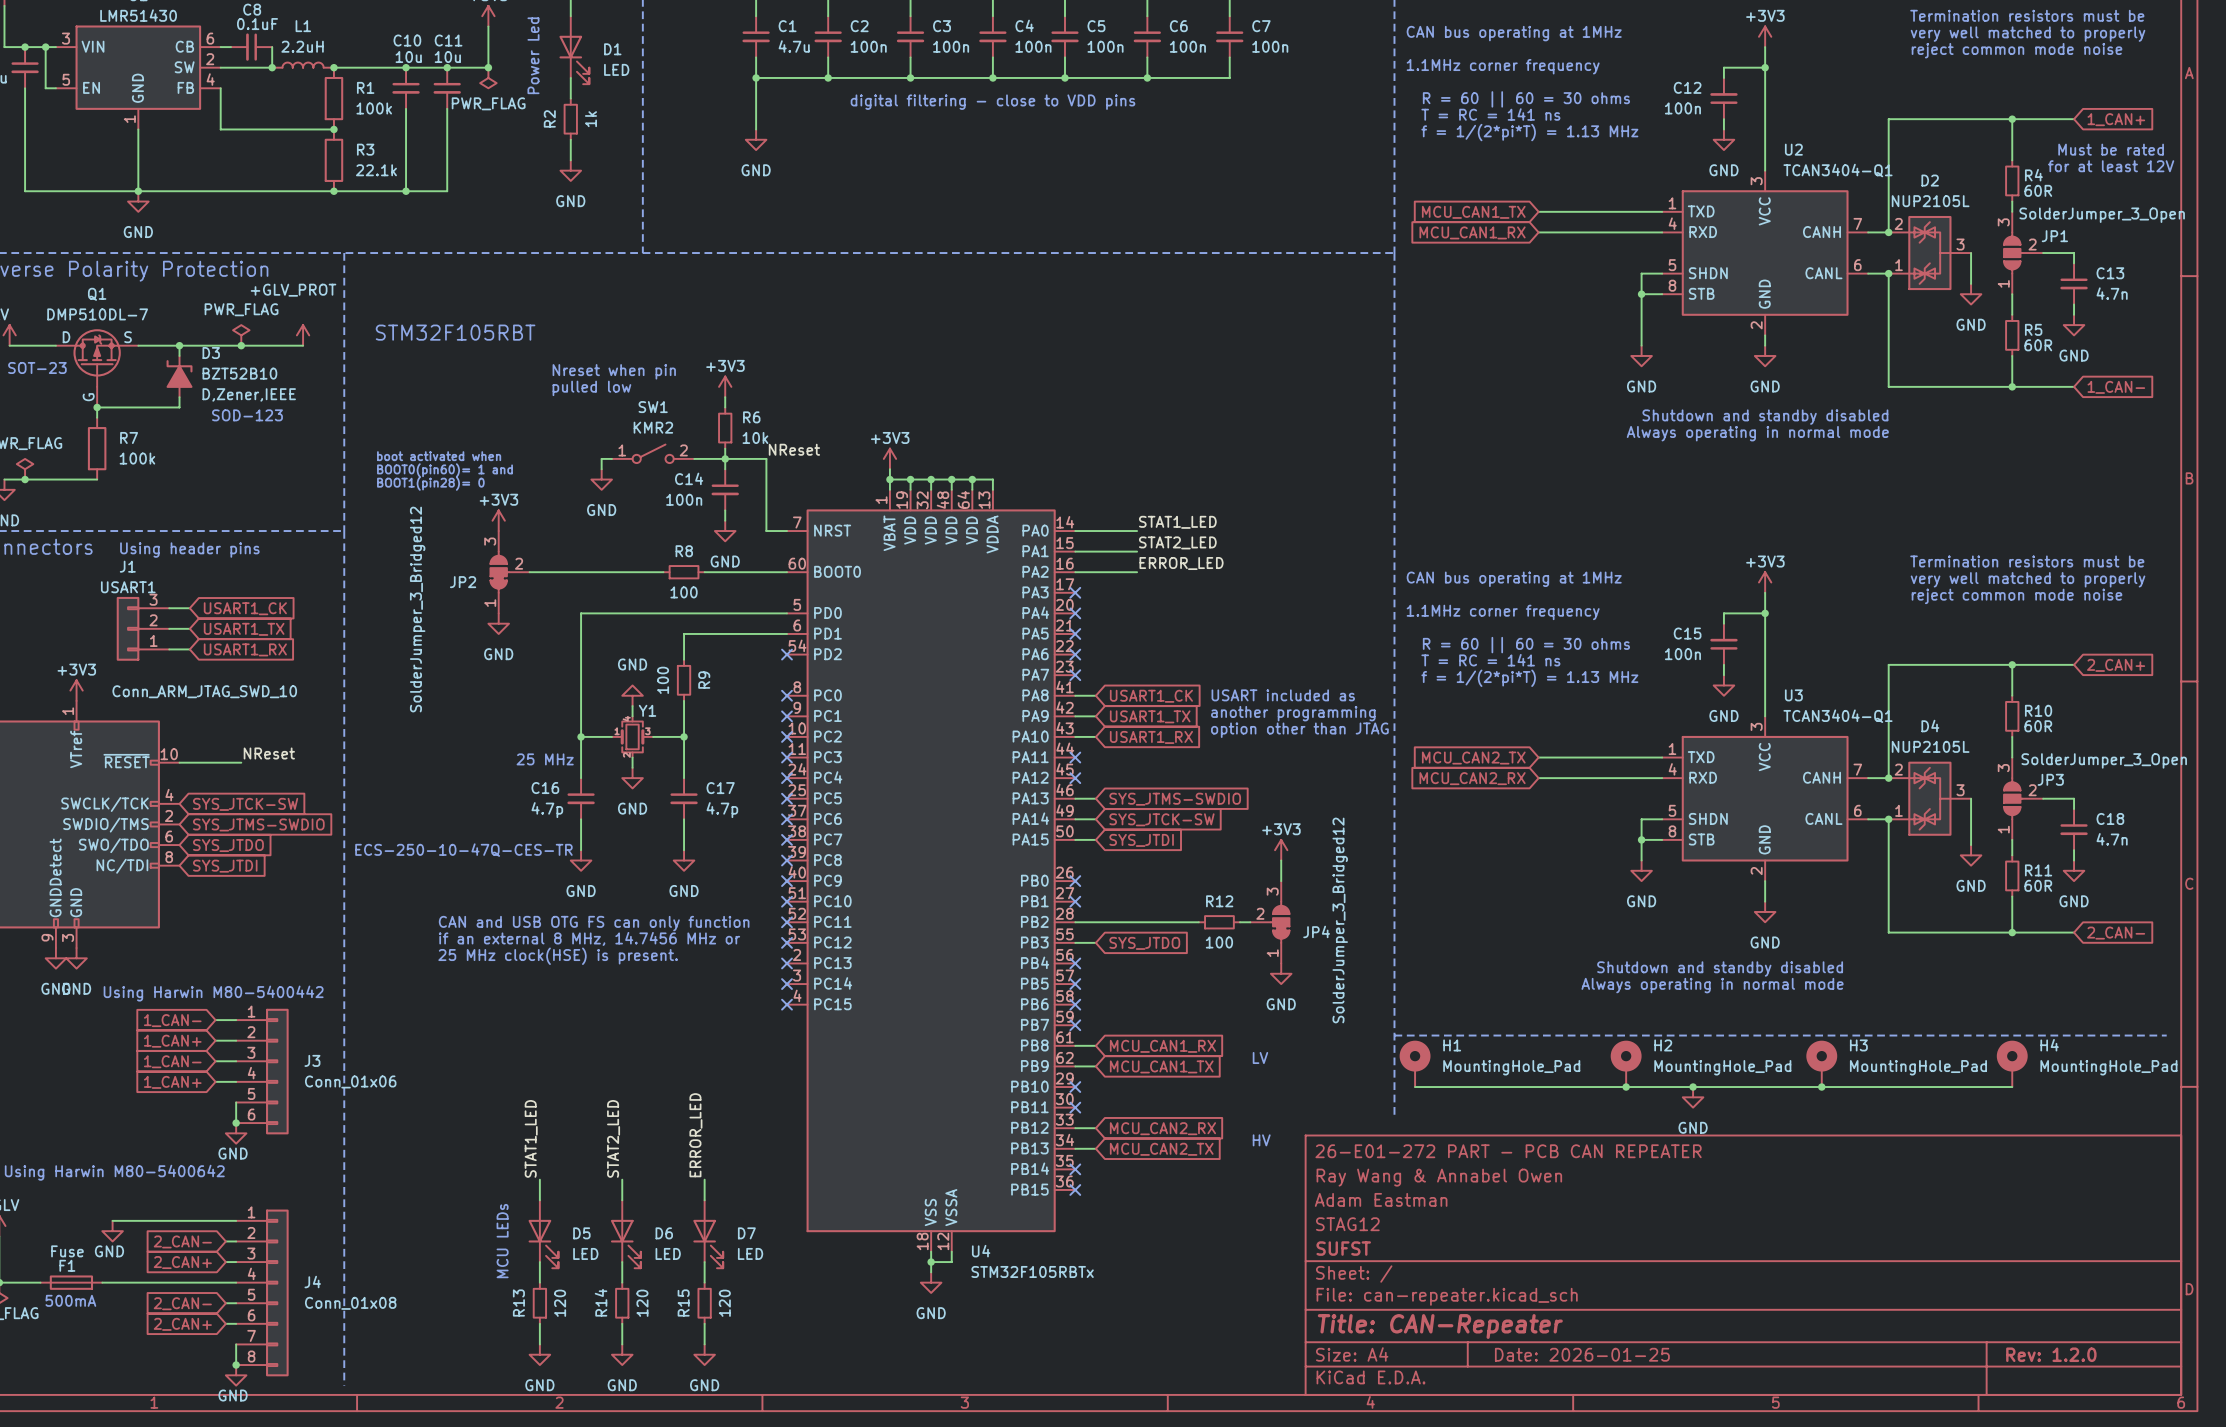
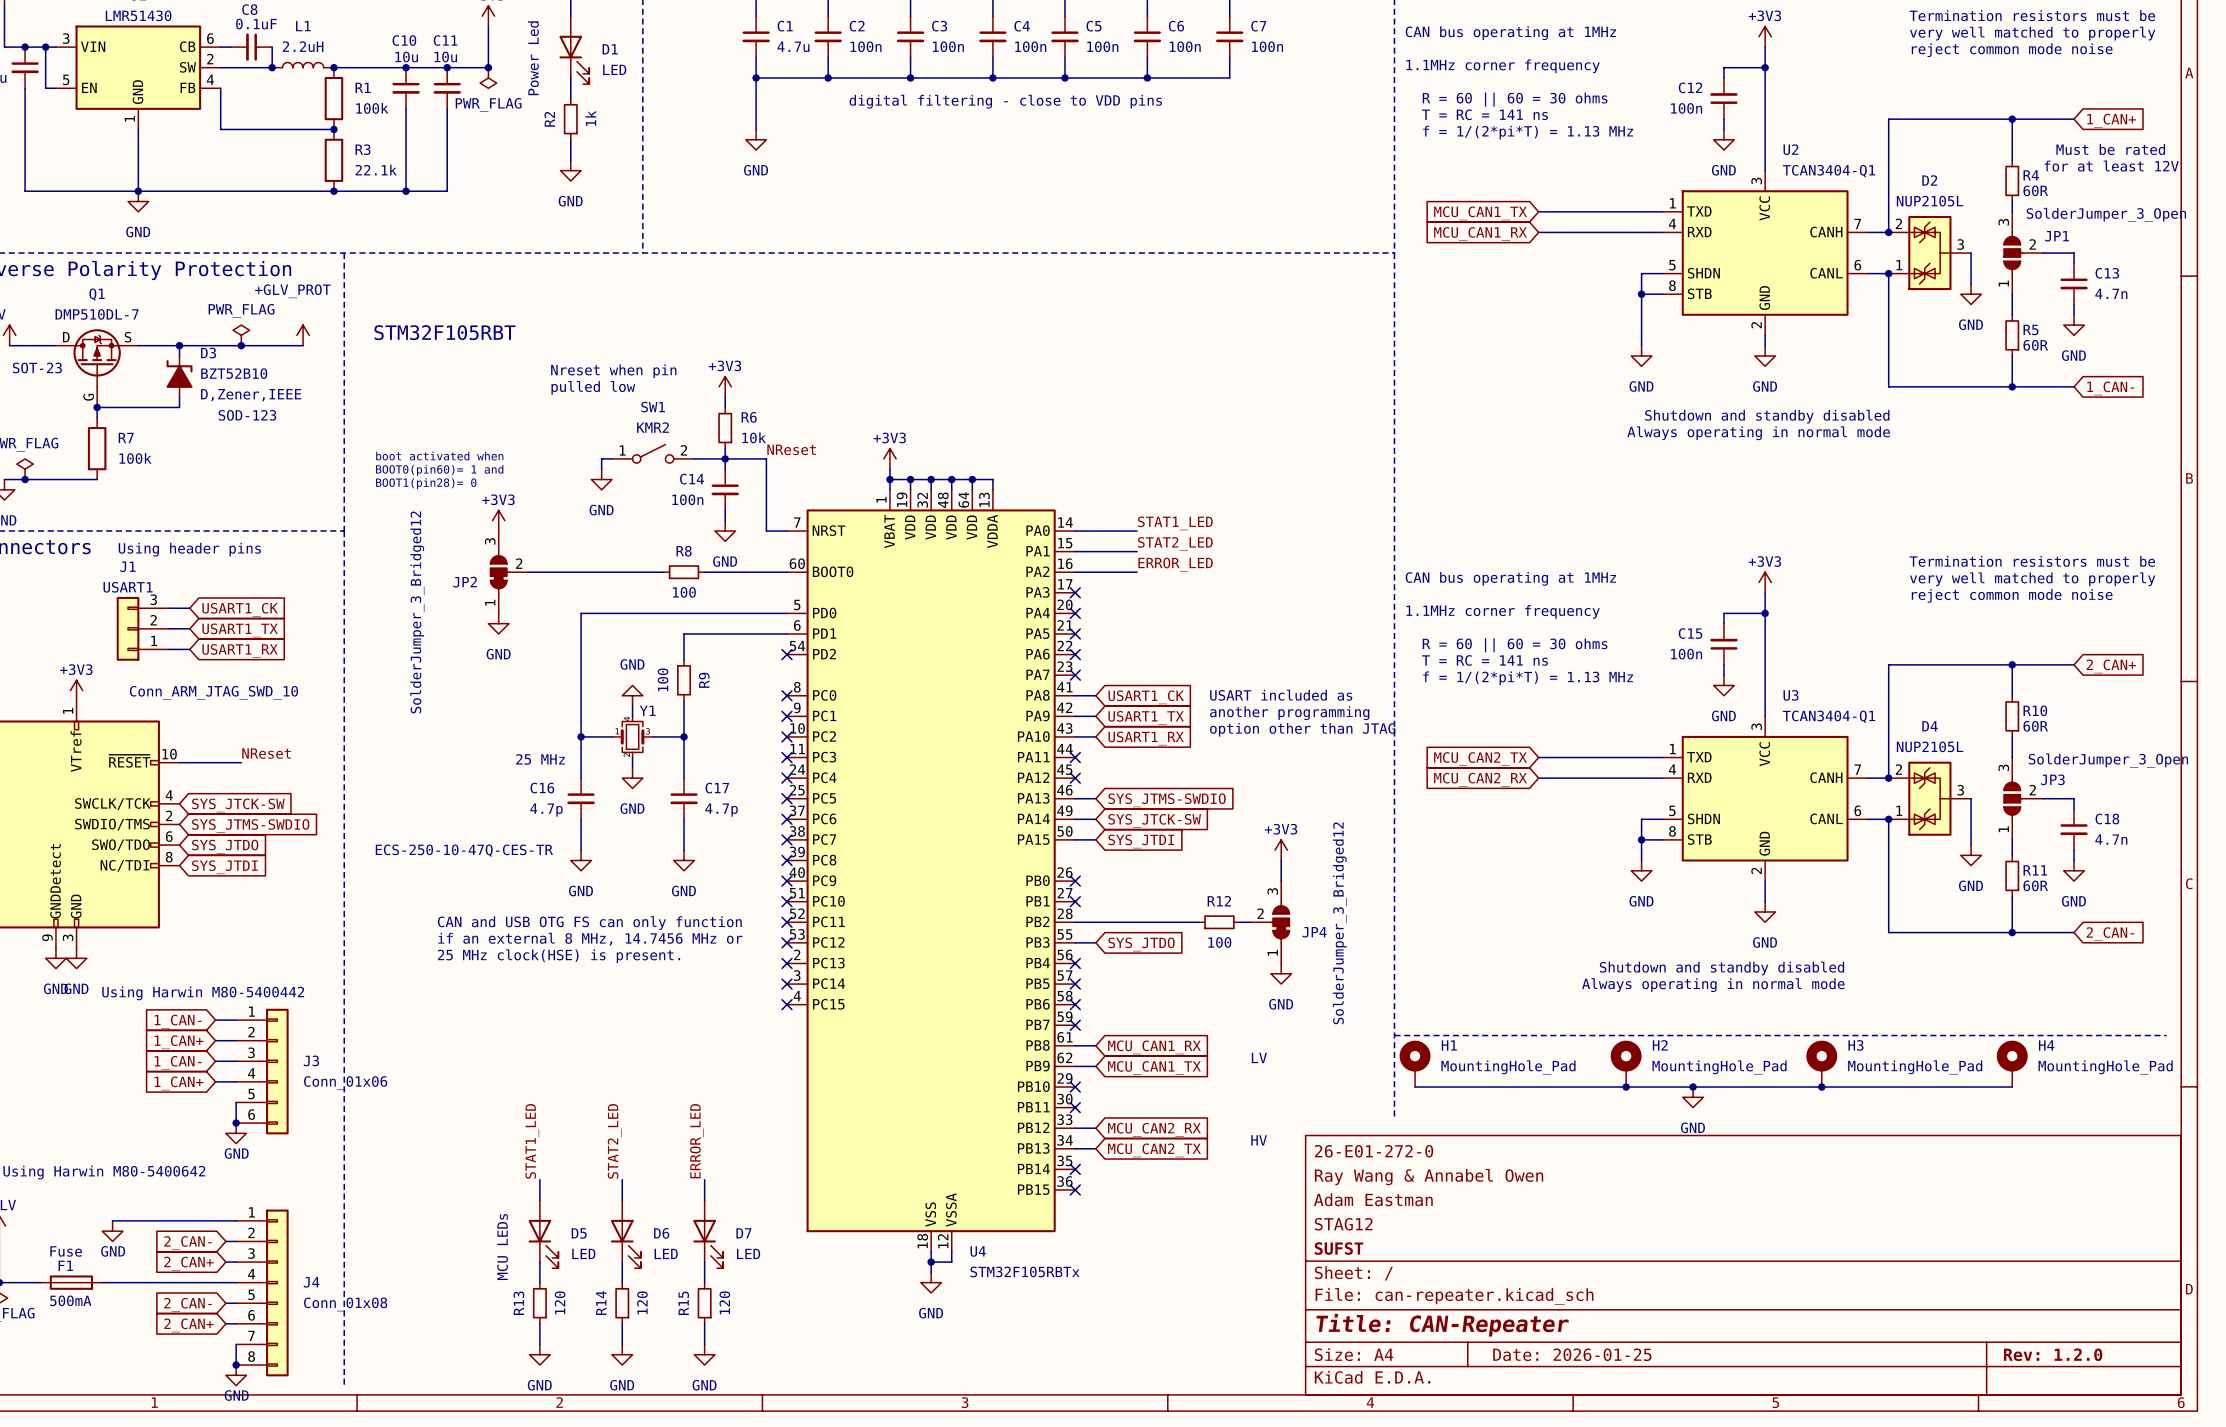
title block: 26-E01-272 PART - PCB CAN REPEATER (1508, 1151) -> 26-E01-272-0 (1374, 1151)

